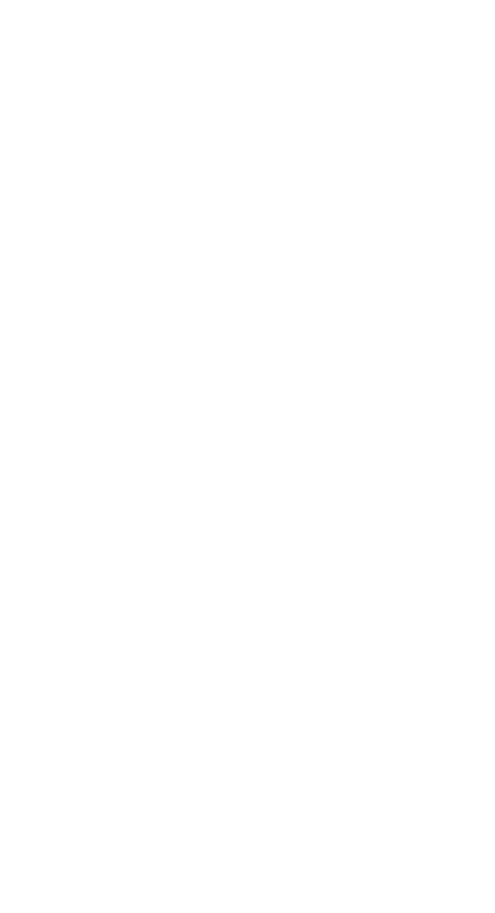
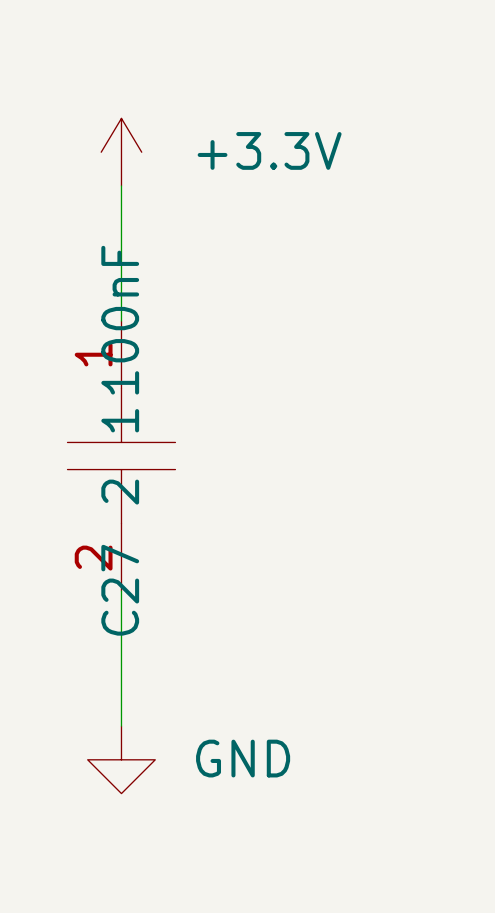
power symbol: none -> +3.3V (121, 152)
wire: none -> (121, 185) (121, 320)
C27: none -> 100nF (121, 456)
wire: none -> (121, 591) (121, 726)
power symbol: none -> GND (121, 759)

